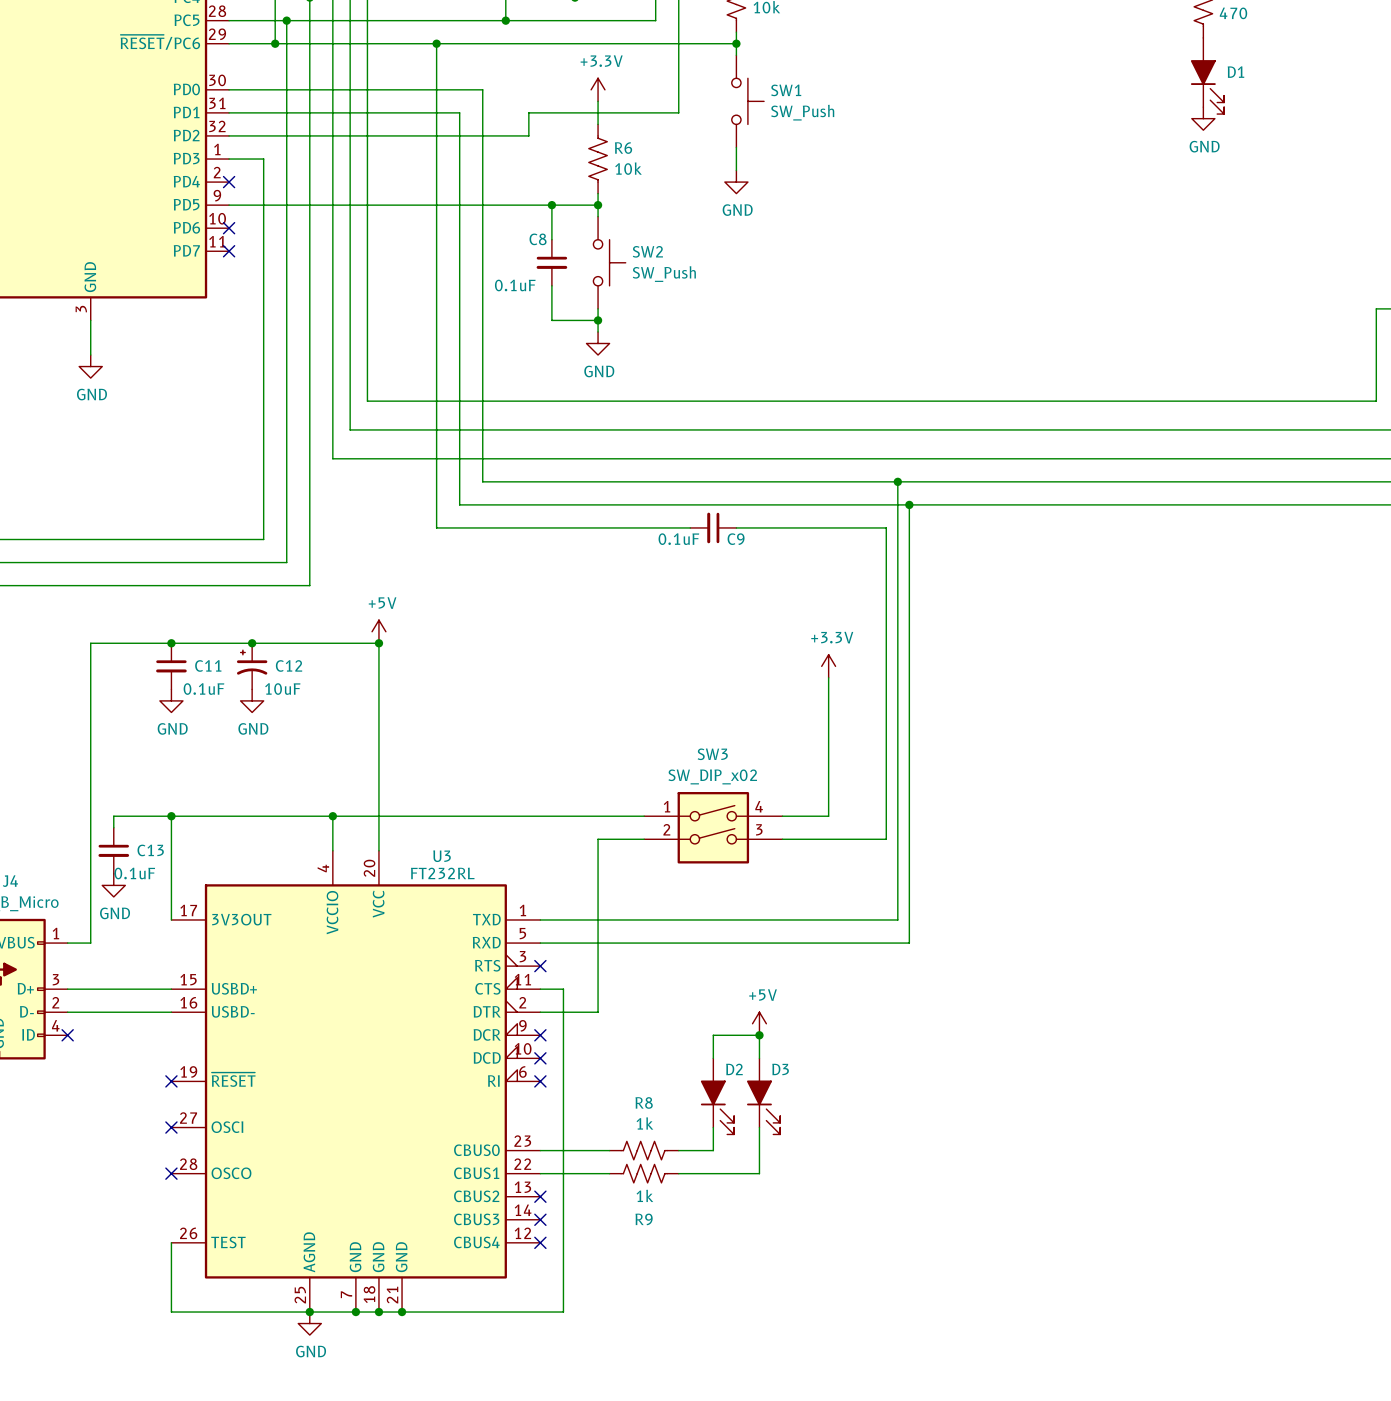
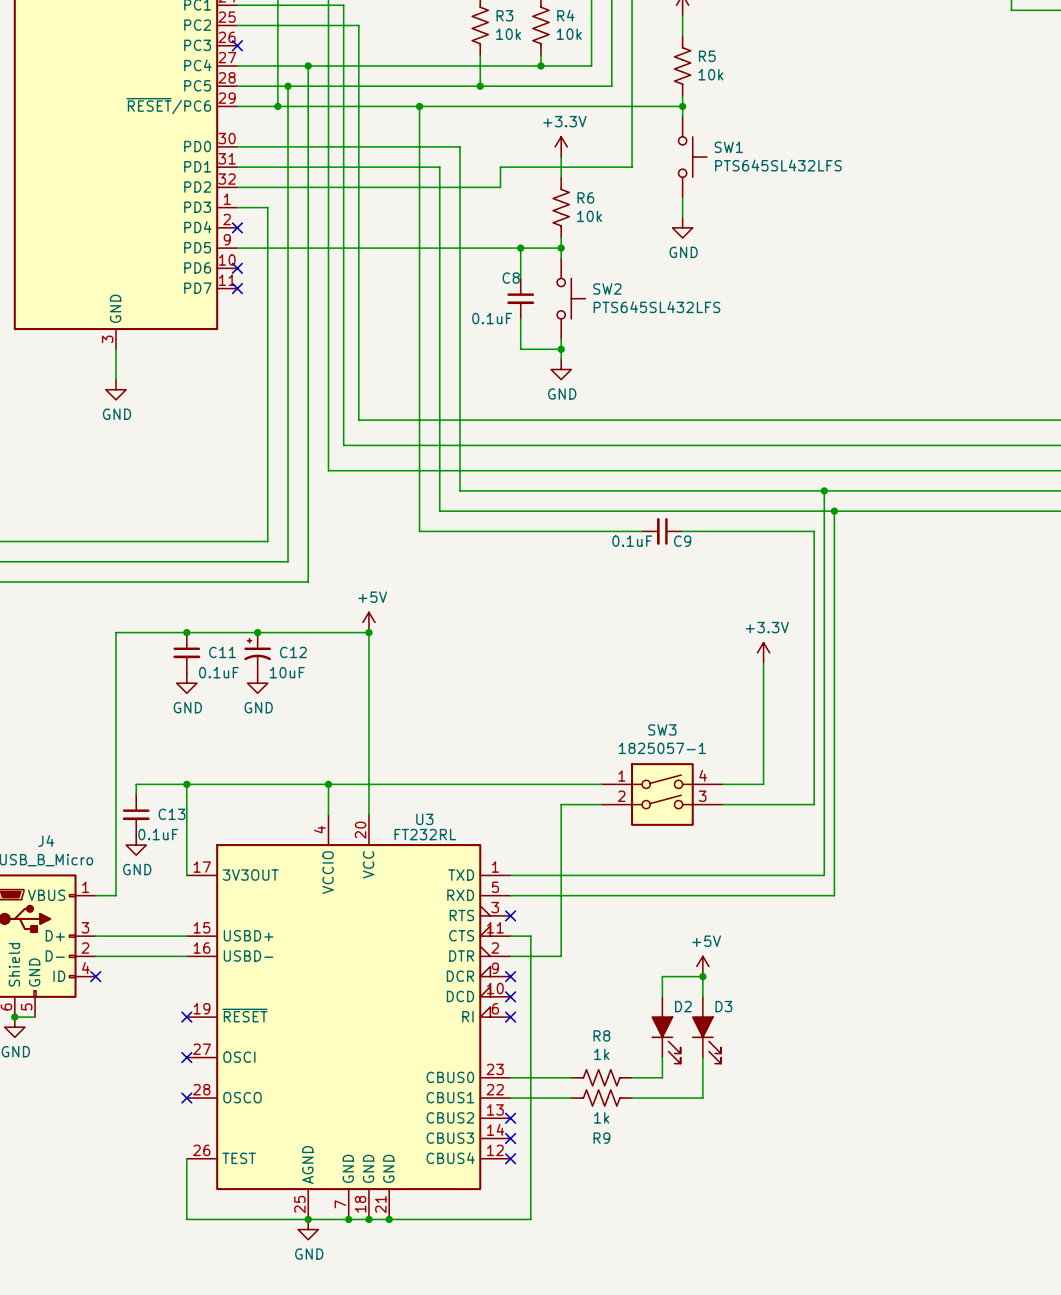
SW1 value: SW_Push (802, 112) -> PTS645SL432LFS (778, 165)
SW2 value: SW_Push (664, 274) -> PTS645SL432LFS (656, 307)
SW3 value: SW_DIP_x02 (712, 776) -> 1825057-1 (662, 748)

